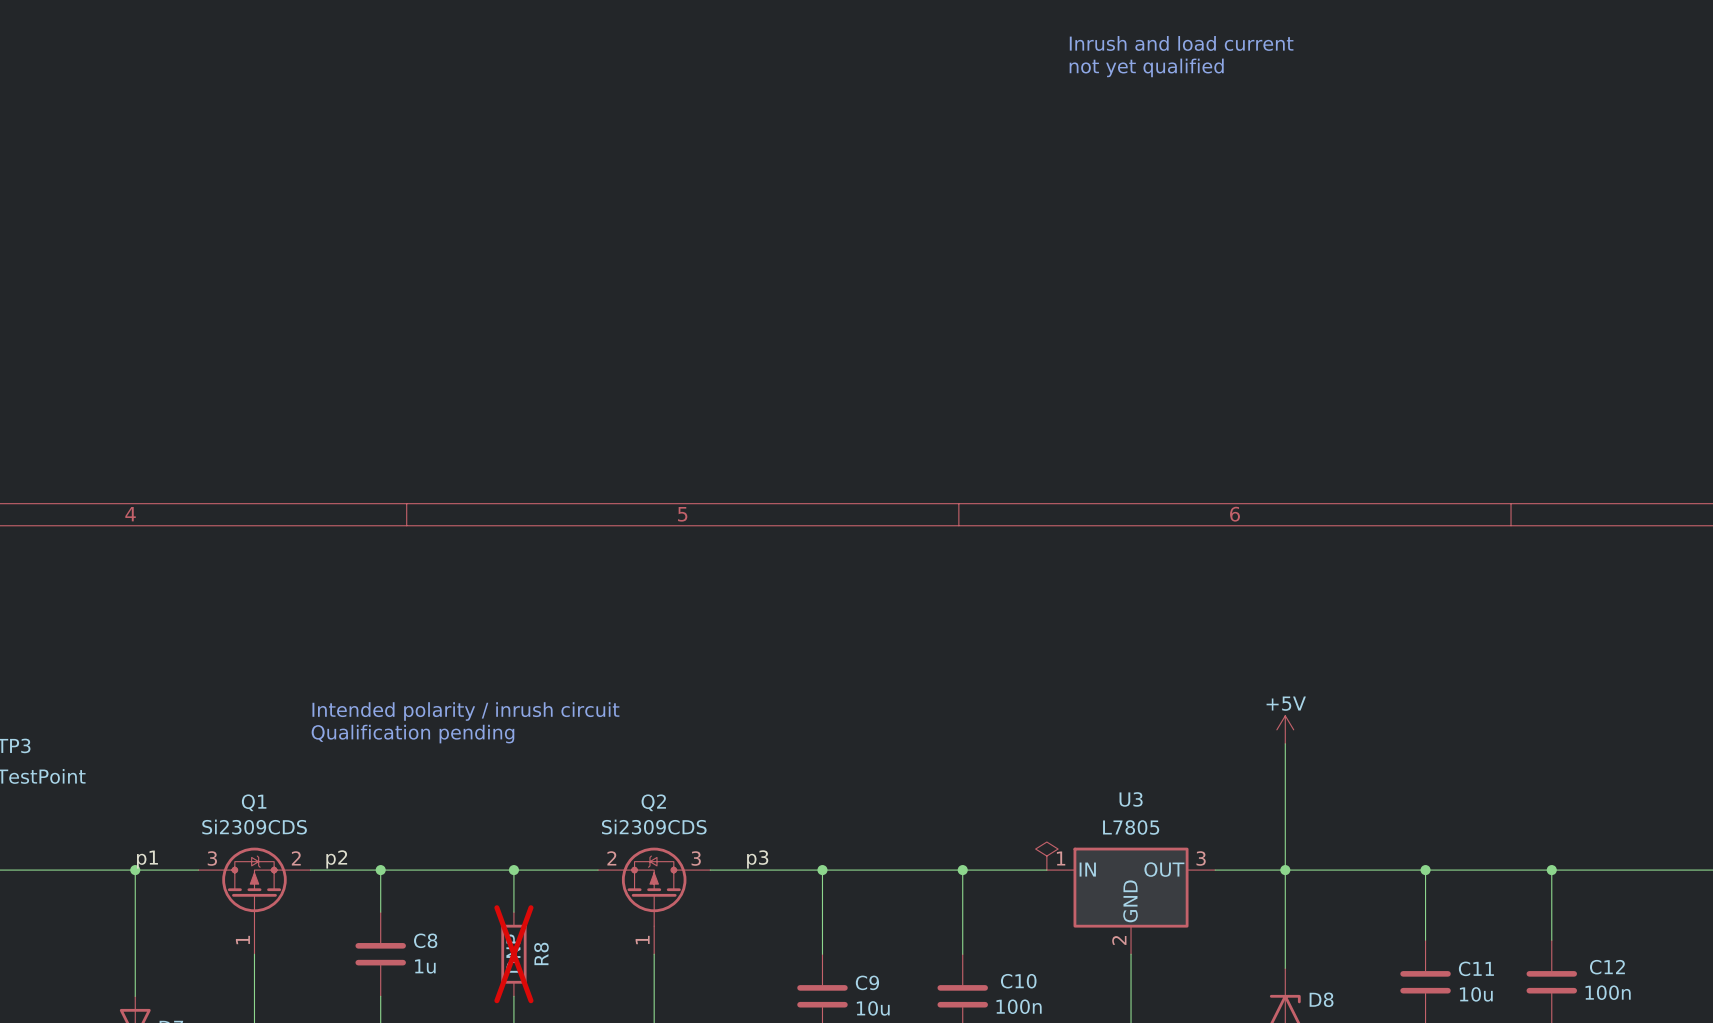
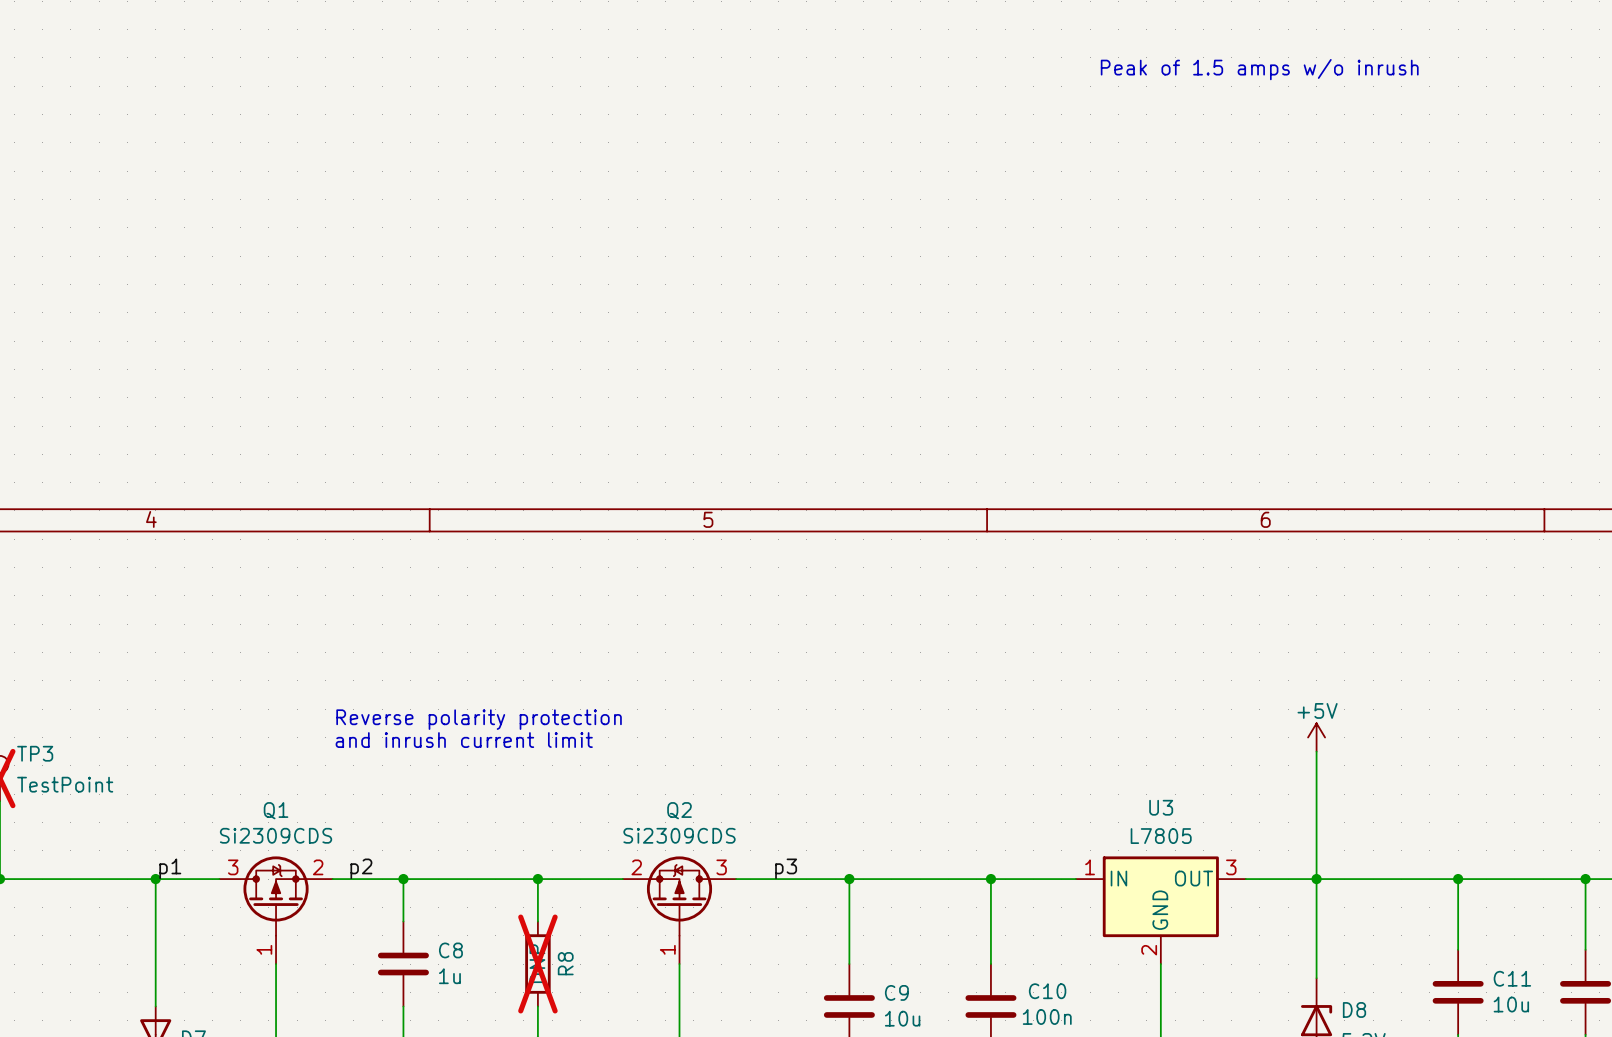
text: Inrush and load current (1181, 43) -> none
text: not yet qualified (1146, 67) -> Peak of 1.5 amps w/o inrush (1259, 69)
text: Intended polarity / inrush circuit (465, 711) -> Reverse polarity protection (479, 719)
text: Qualification pending (412, 734) -> and inrush current limit (464, 740)
power symbol: (1046, 856) -> none

